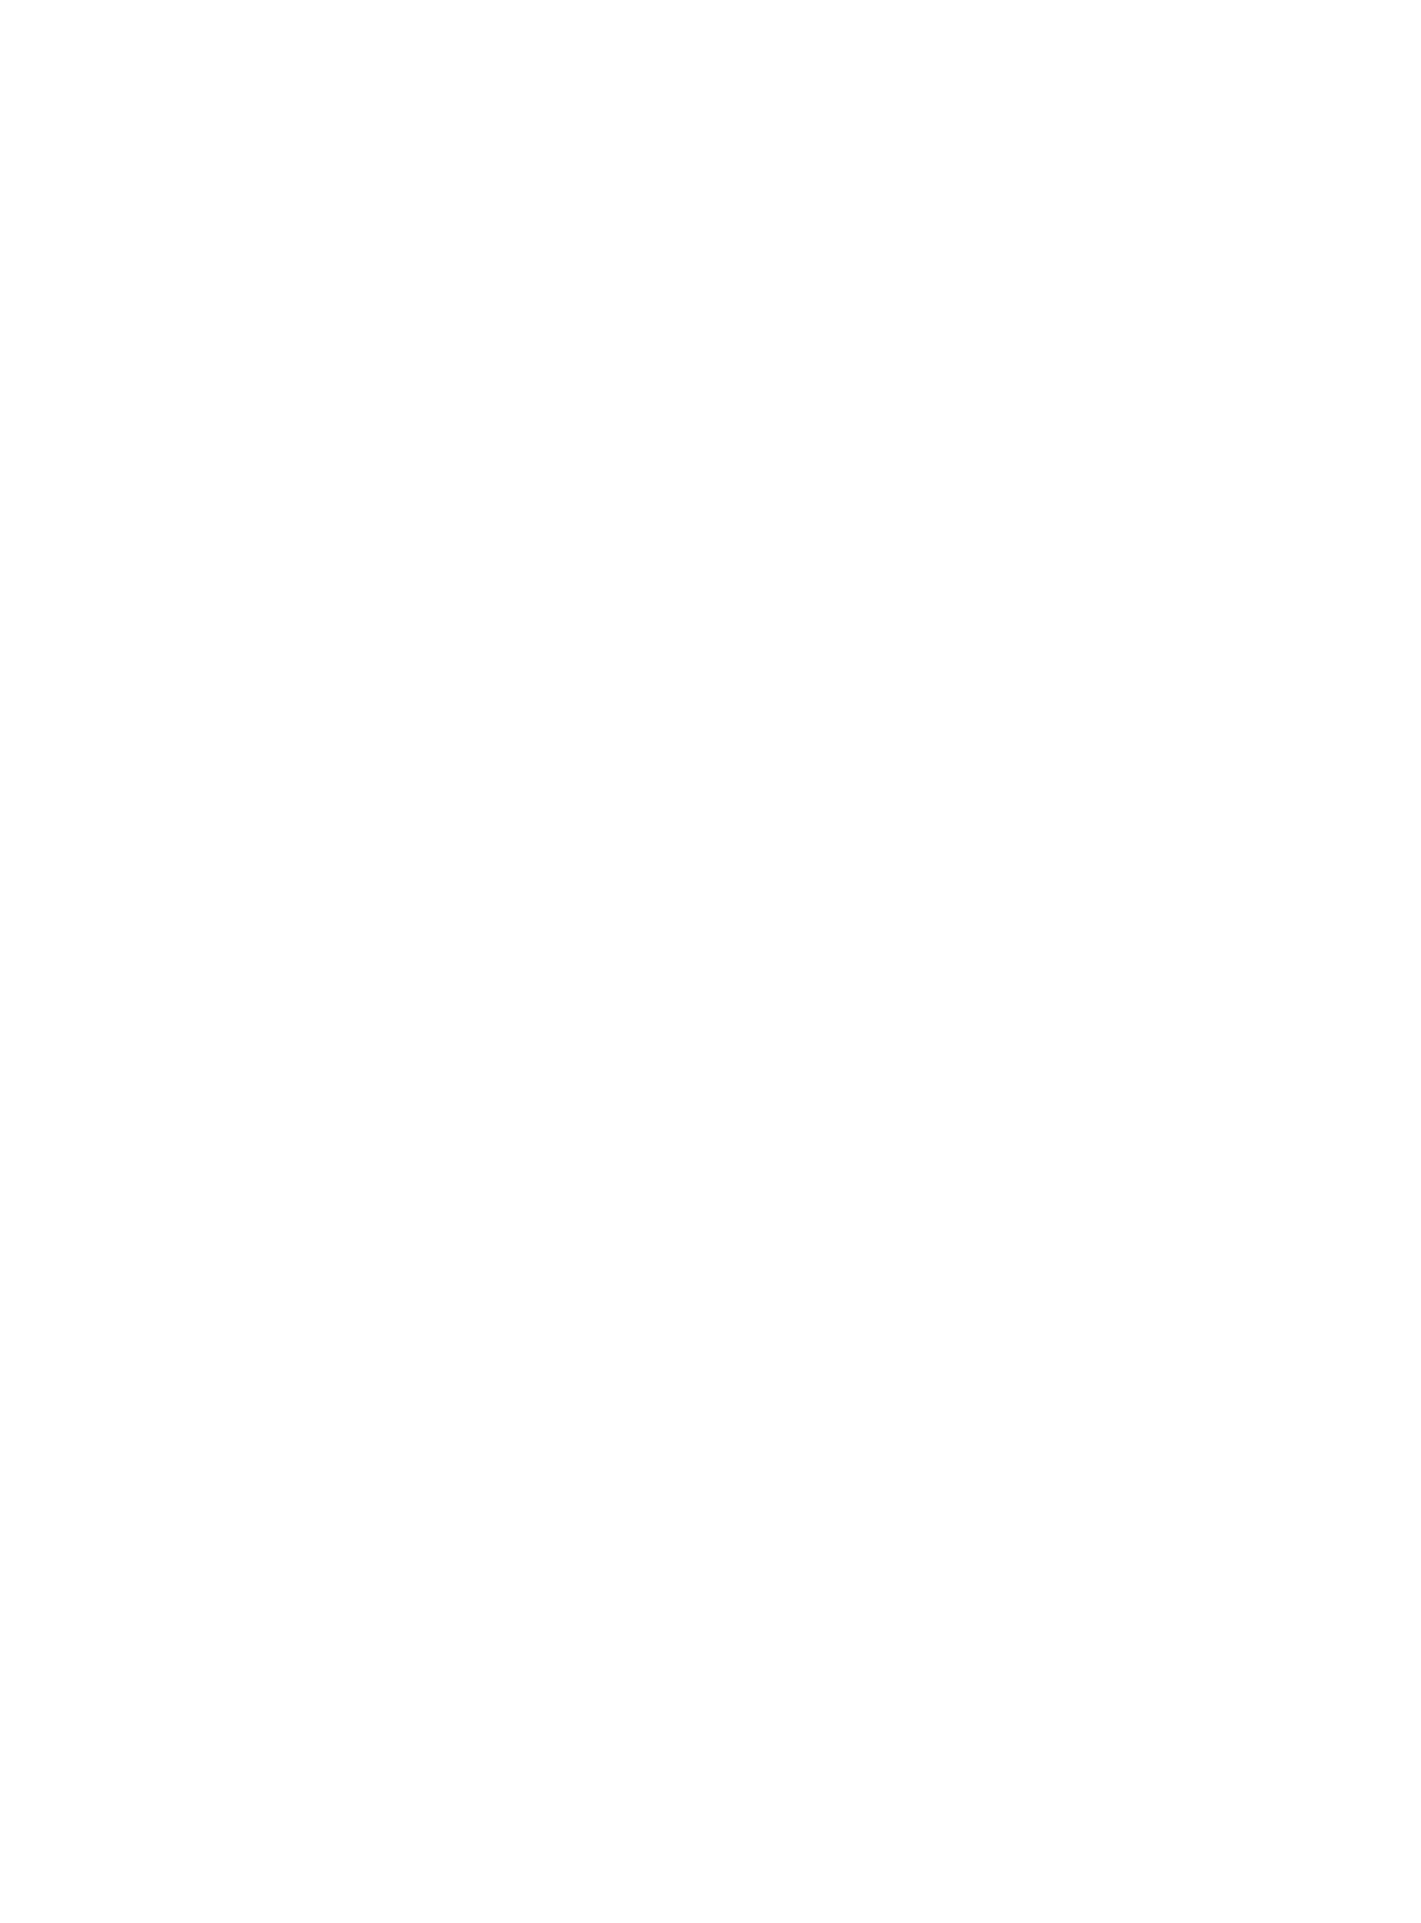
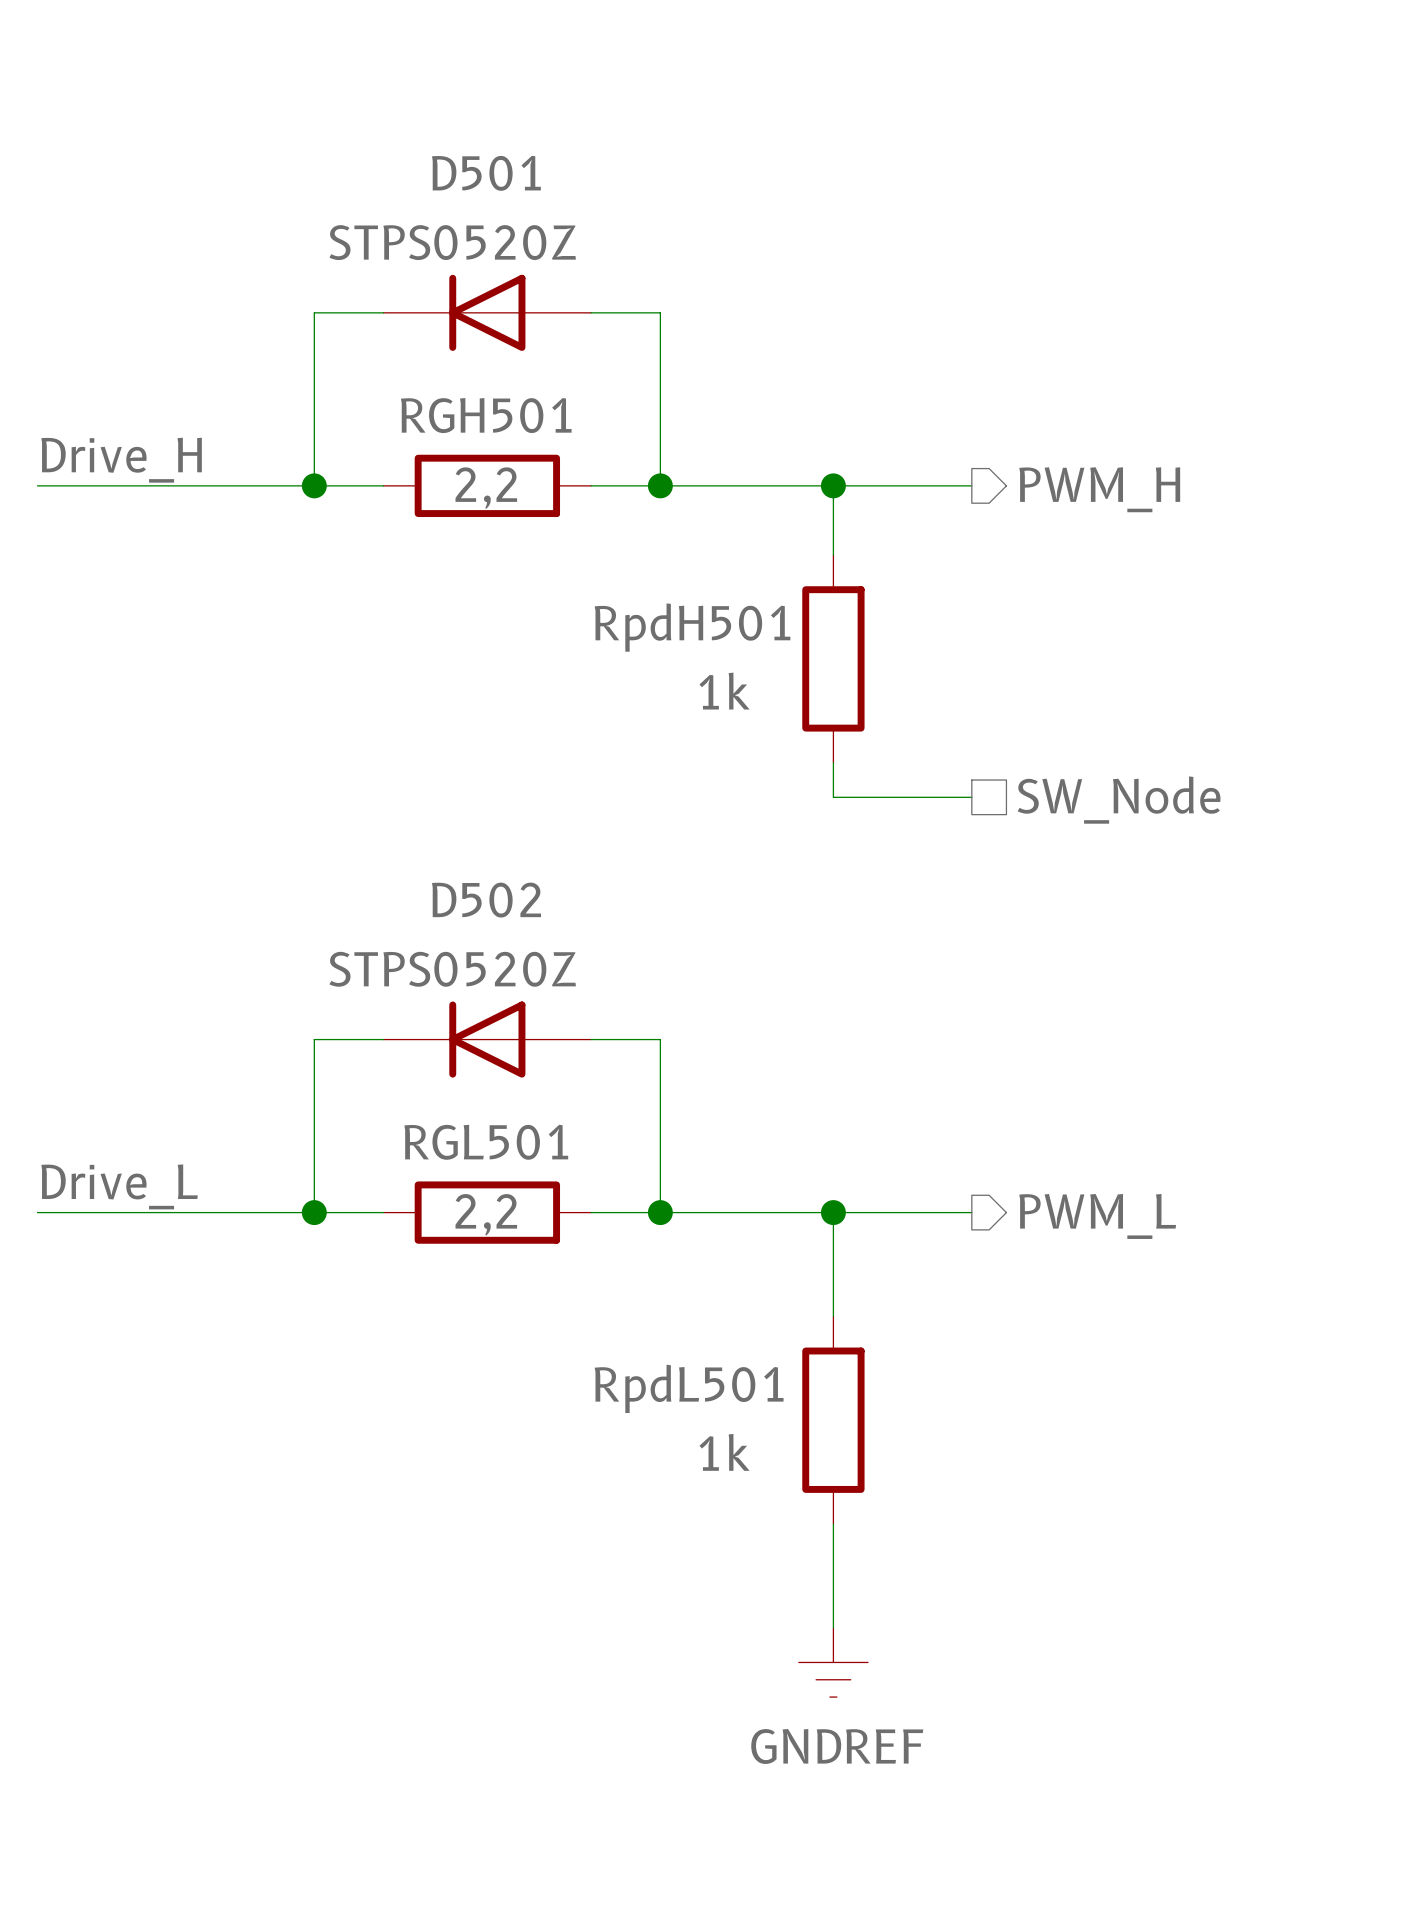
wire: none -> (383, 312) (314, 312) (314, 485)
D501: none -> STPS0520Z (487, 312)
wire: none -> (591, 312) (660, 312) (660, 485)
label: none -> Drive_H (121, 460)
wire: none -> (37, 485) (383, 485)
junction: none -> (314, 485)
RGH501: none -> 2,2 (487, 485)
wire: none -> (591, 485) (971, 485)
junction: none -> (660, 485)
wire: none -> (833, 485) (833, 555)
junction: none -> (833, 485)
hierarchical label: none -> PWM_H (1099, 489)
RpdH501: none -> 1k (833, 658)
wire: none -> (833, 762) (833, 797) (971, 797)
hierarchical label: none -> SW_Node (1119, 800)
wire: none -> (383, 1039) (314, 1039) (314, 1212)
D502: none -> STPS0520Z (487, 1039)
wire: none -> (591, 1039) (660, 1039) (660, 1212)
label: none -> Drive_L (119, 1186)
wire: none -> (37, 1212) (383, 1212)
junction: none -> (314, 1212)
RGL501: none -> 2,2 (487, 1212)
wire: none -> (591, 1212) (971, 1212)
junction: none -> (660, 1212)
wire: none -> (833, 1212) (833, 1316)
junction: none -> (833, 1212)
hierarchical label: none -> PWM_L (1097, 1216)
RpdL501: none -> 1k (833, 1420)
wire: none -> (833, 1524) (833, 1627)
power symbol: none -> GNDREF (833, 1662)

